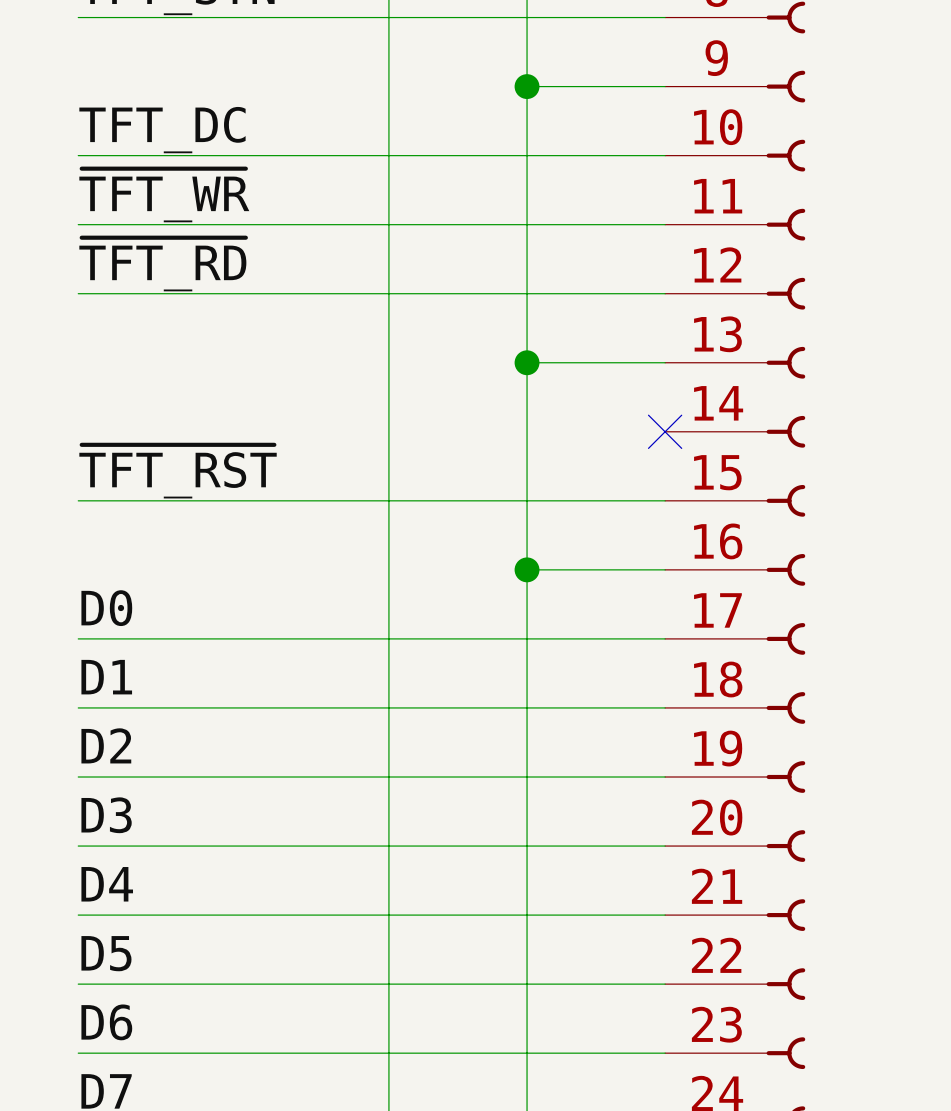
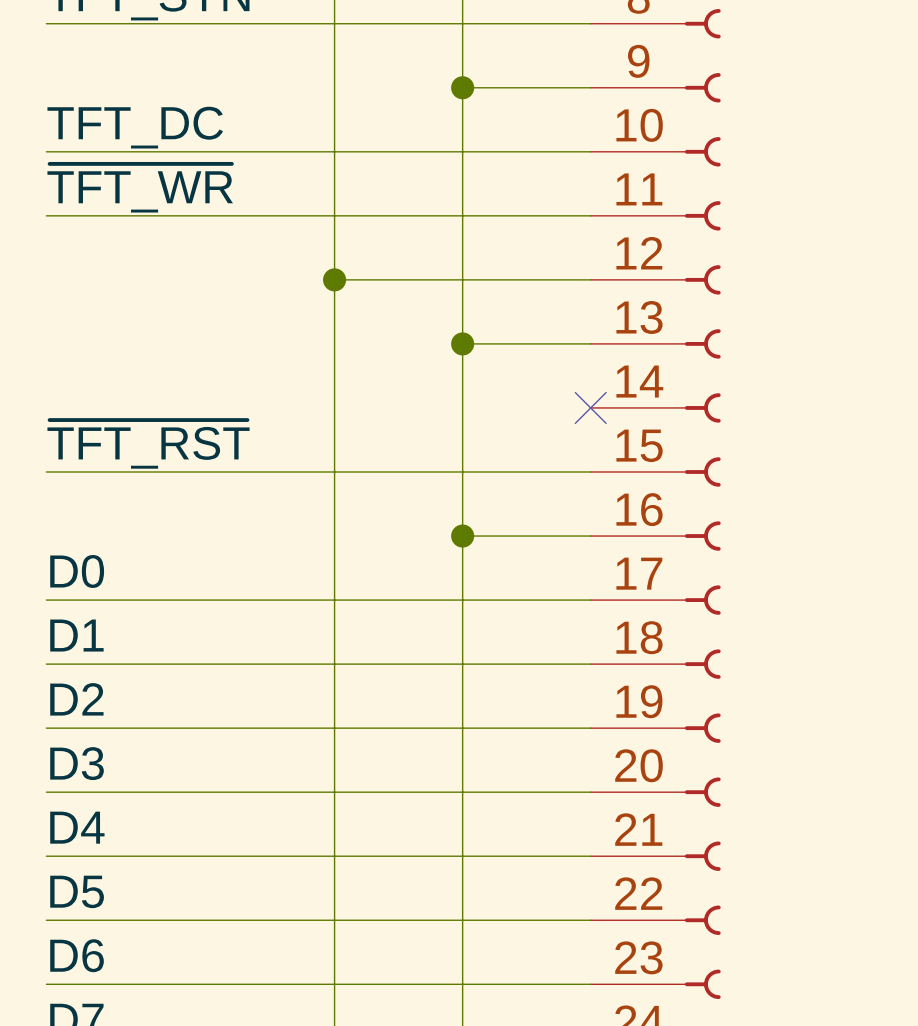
label: ~{TFT_RD} (162, 264) -> none
wire: (78, 293) (388, 293) -> none
junction: none -> (334, 279)

